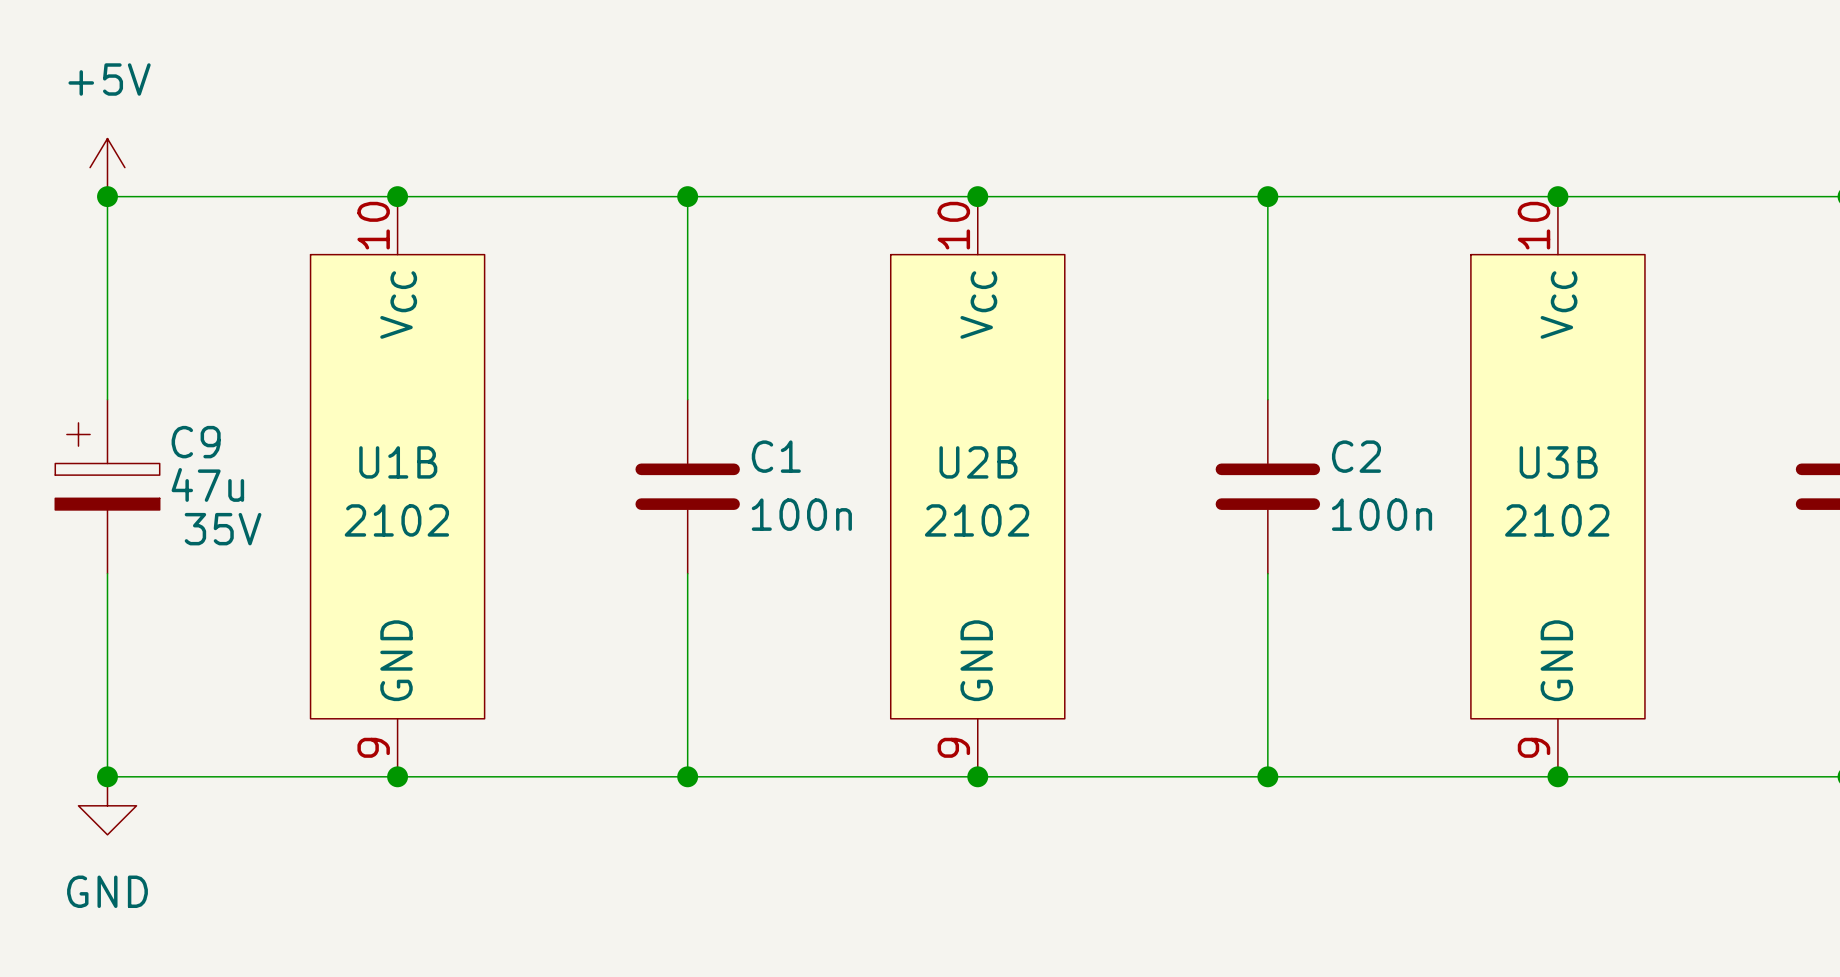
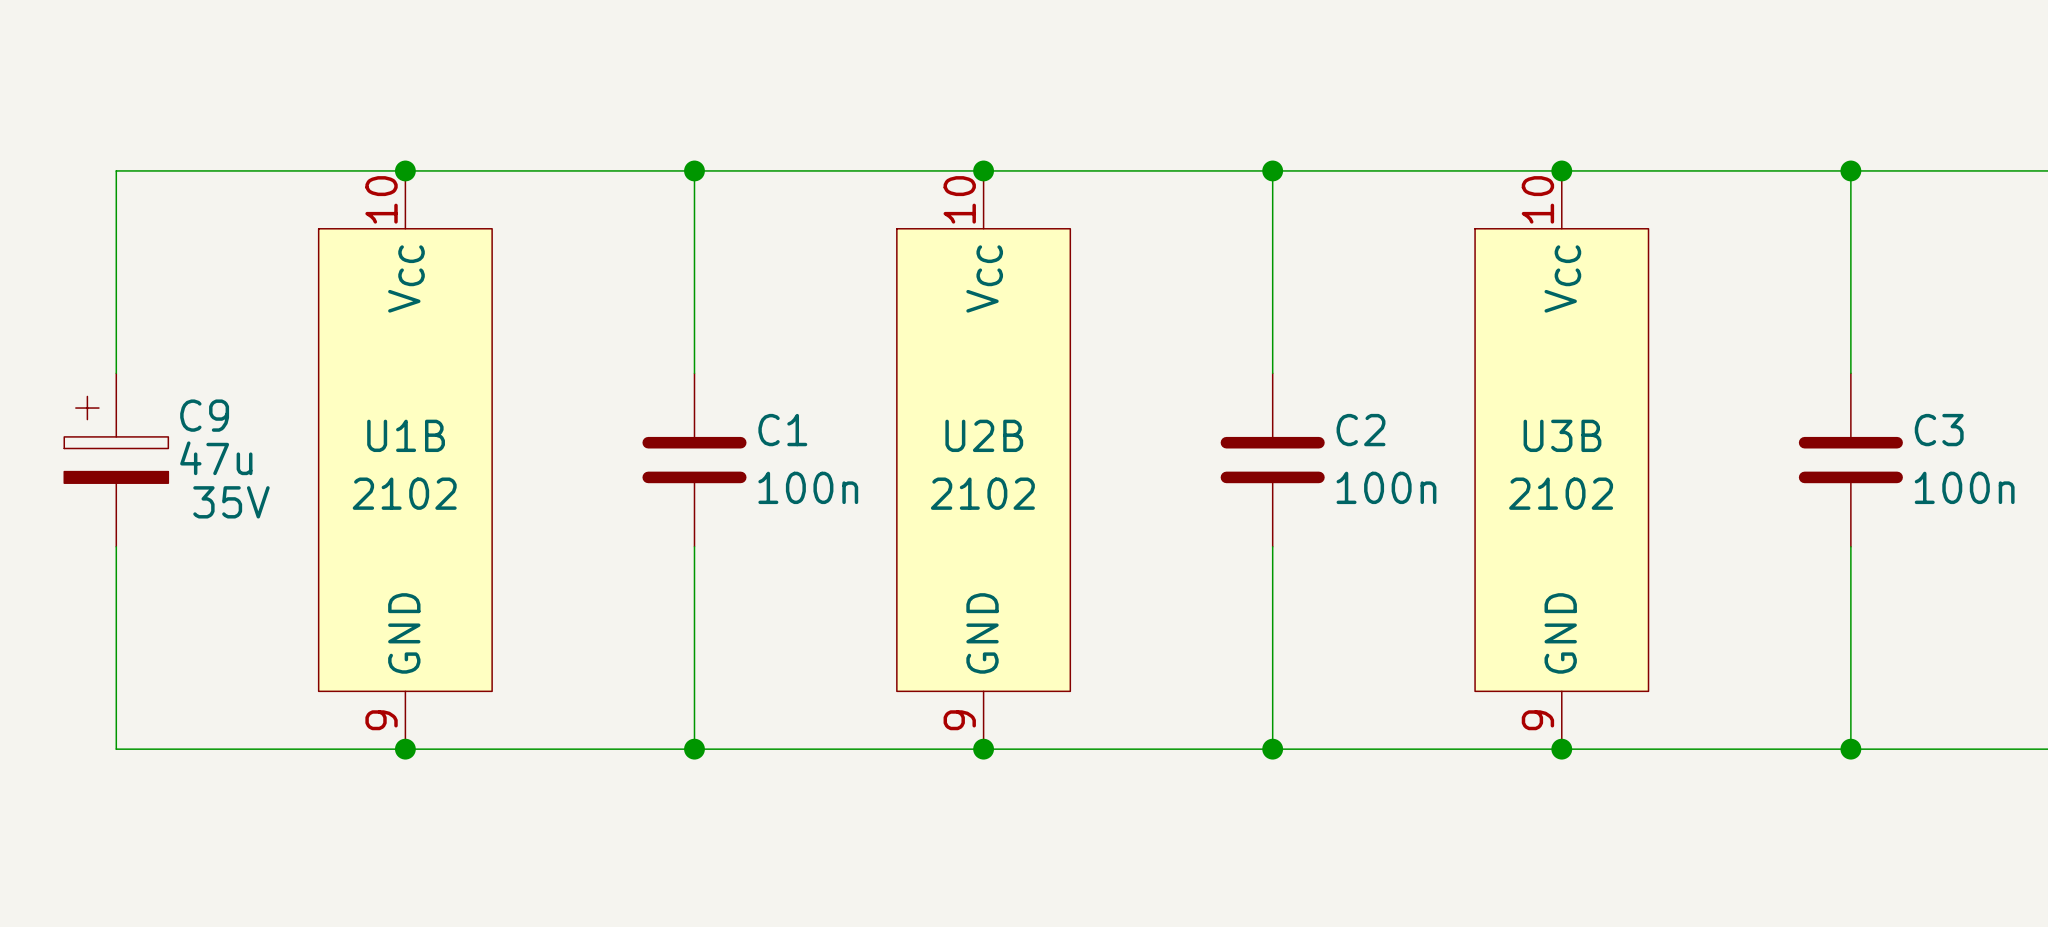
power symbol: +5V (107, 167) -> none
junction: (107, 196) -> none
junction: (107, 776) -> none
power symbol: GND (107, 805) -> none

